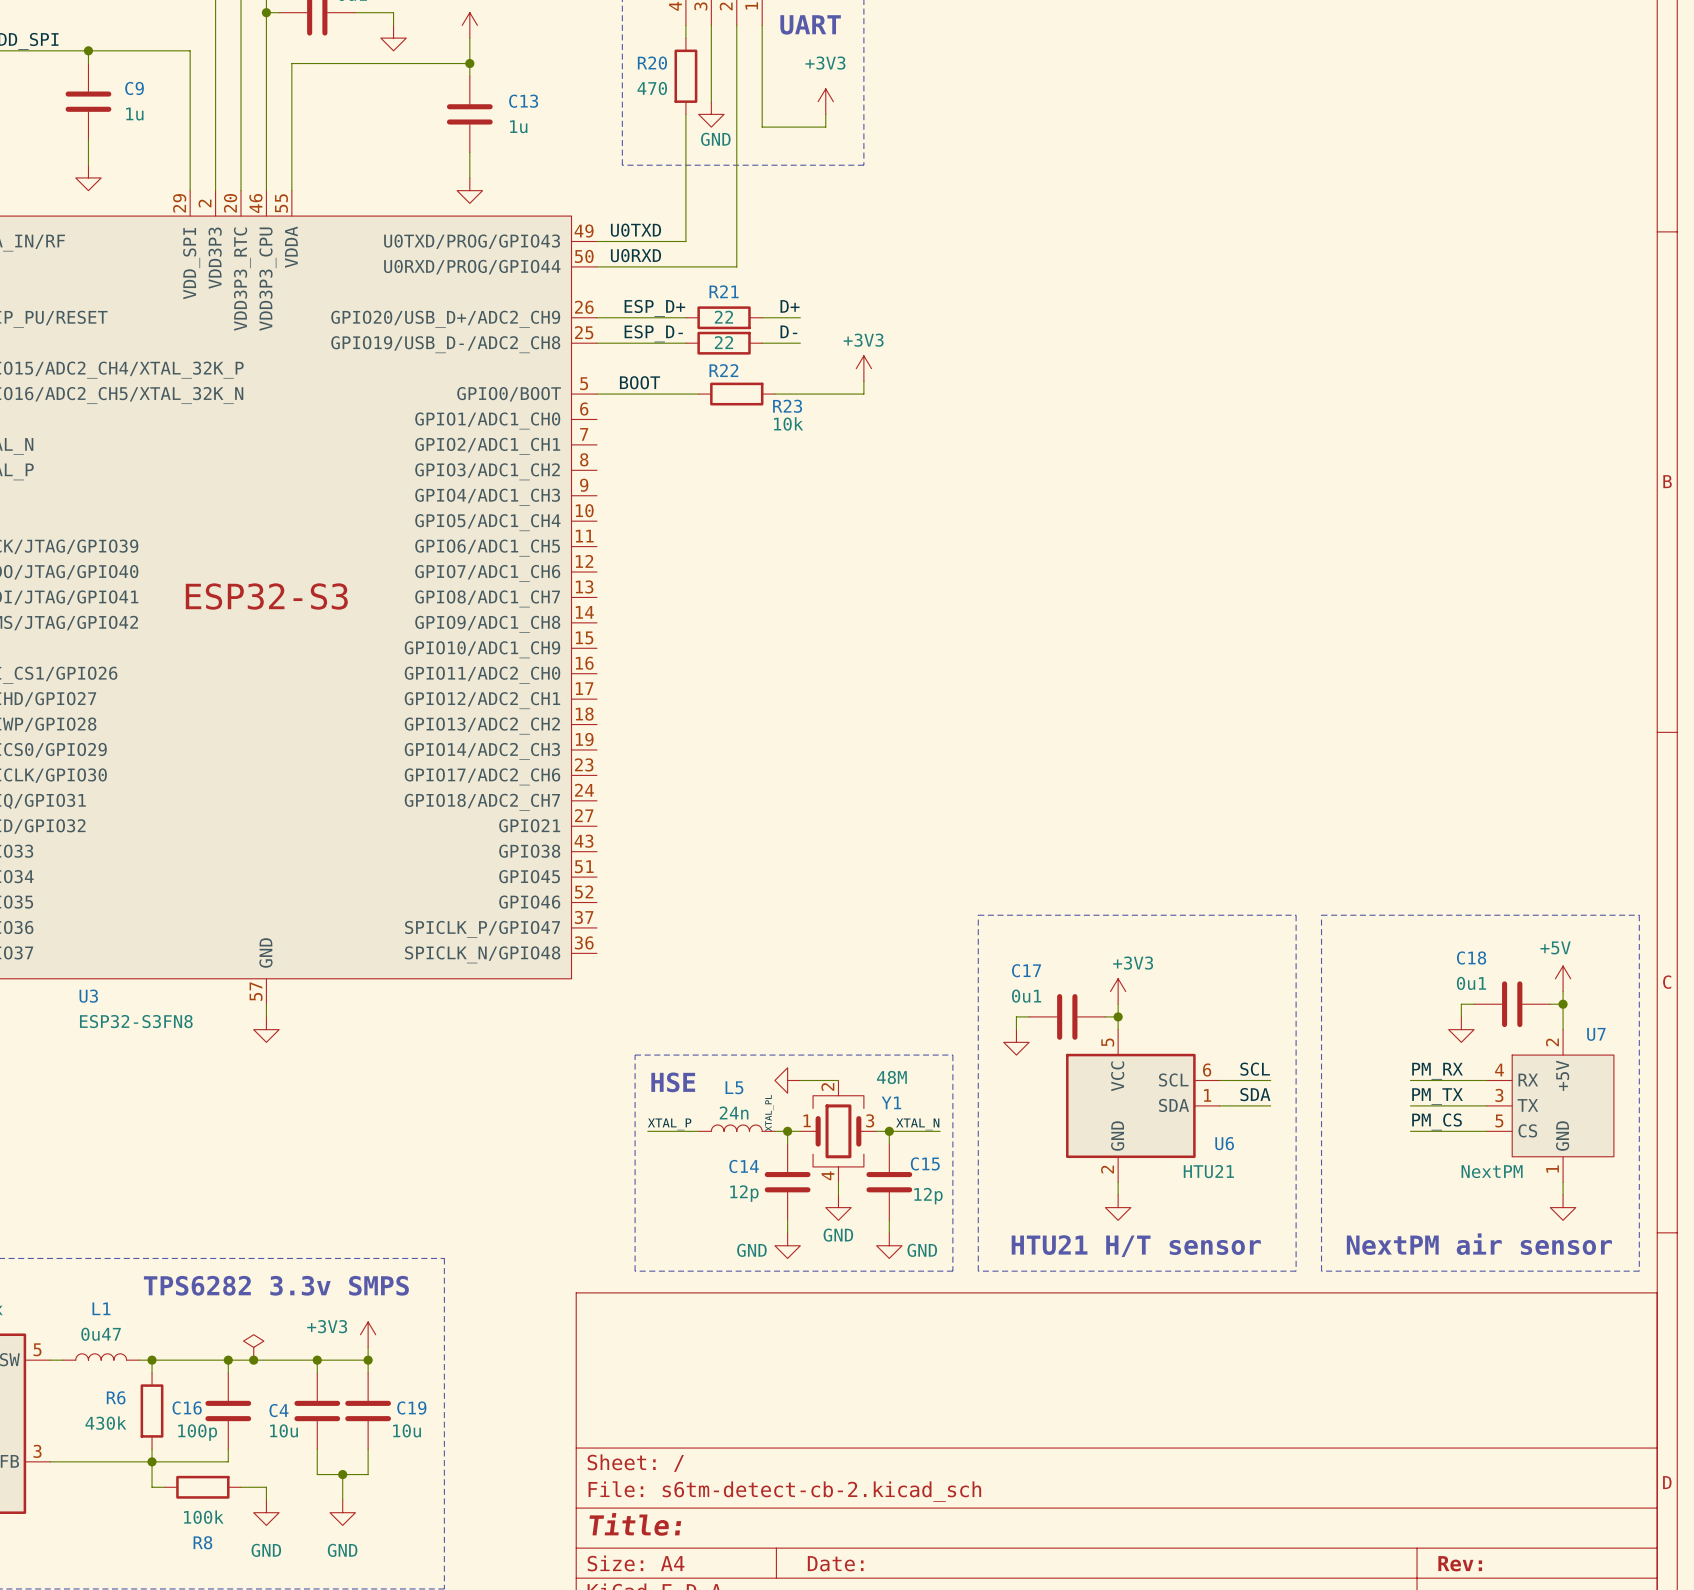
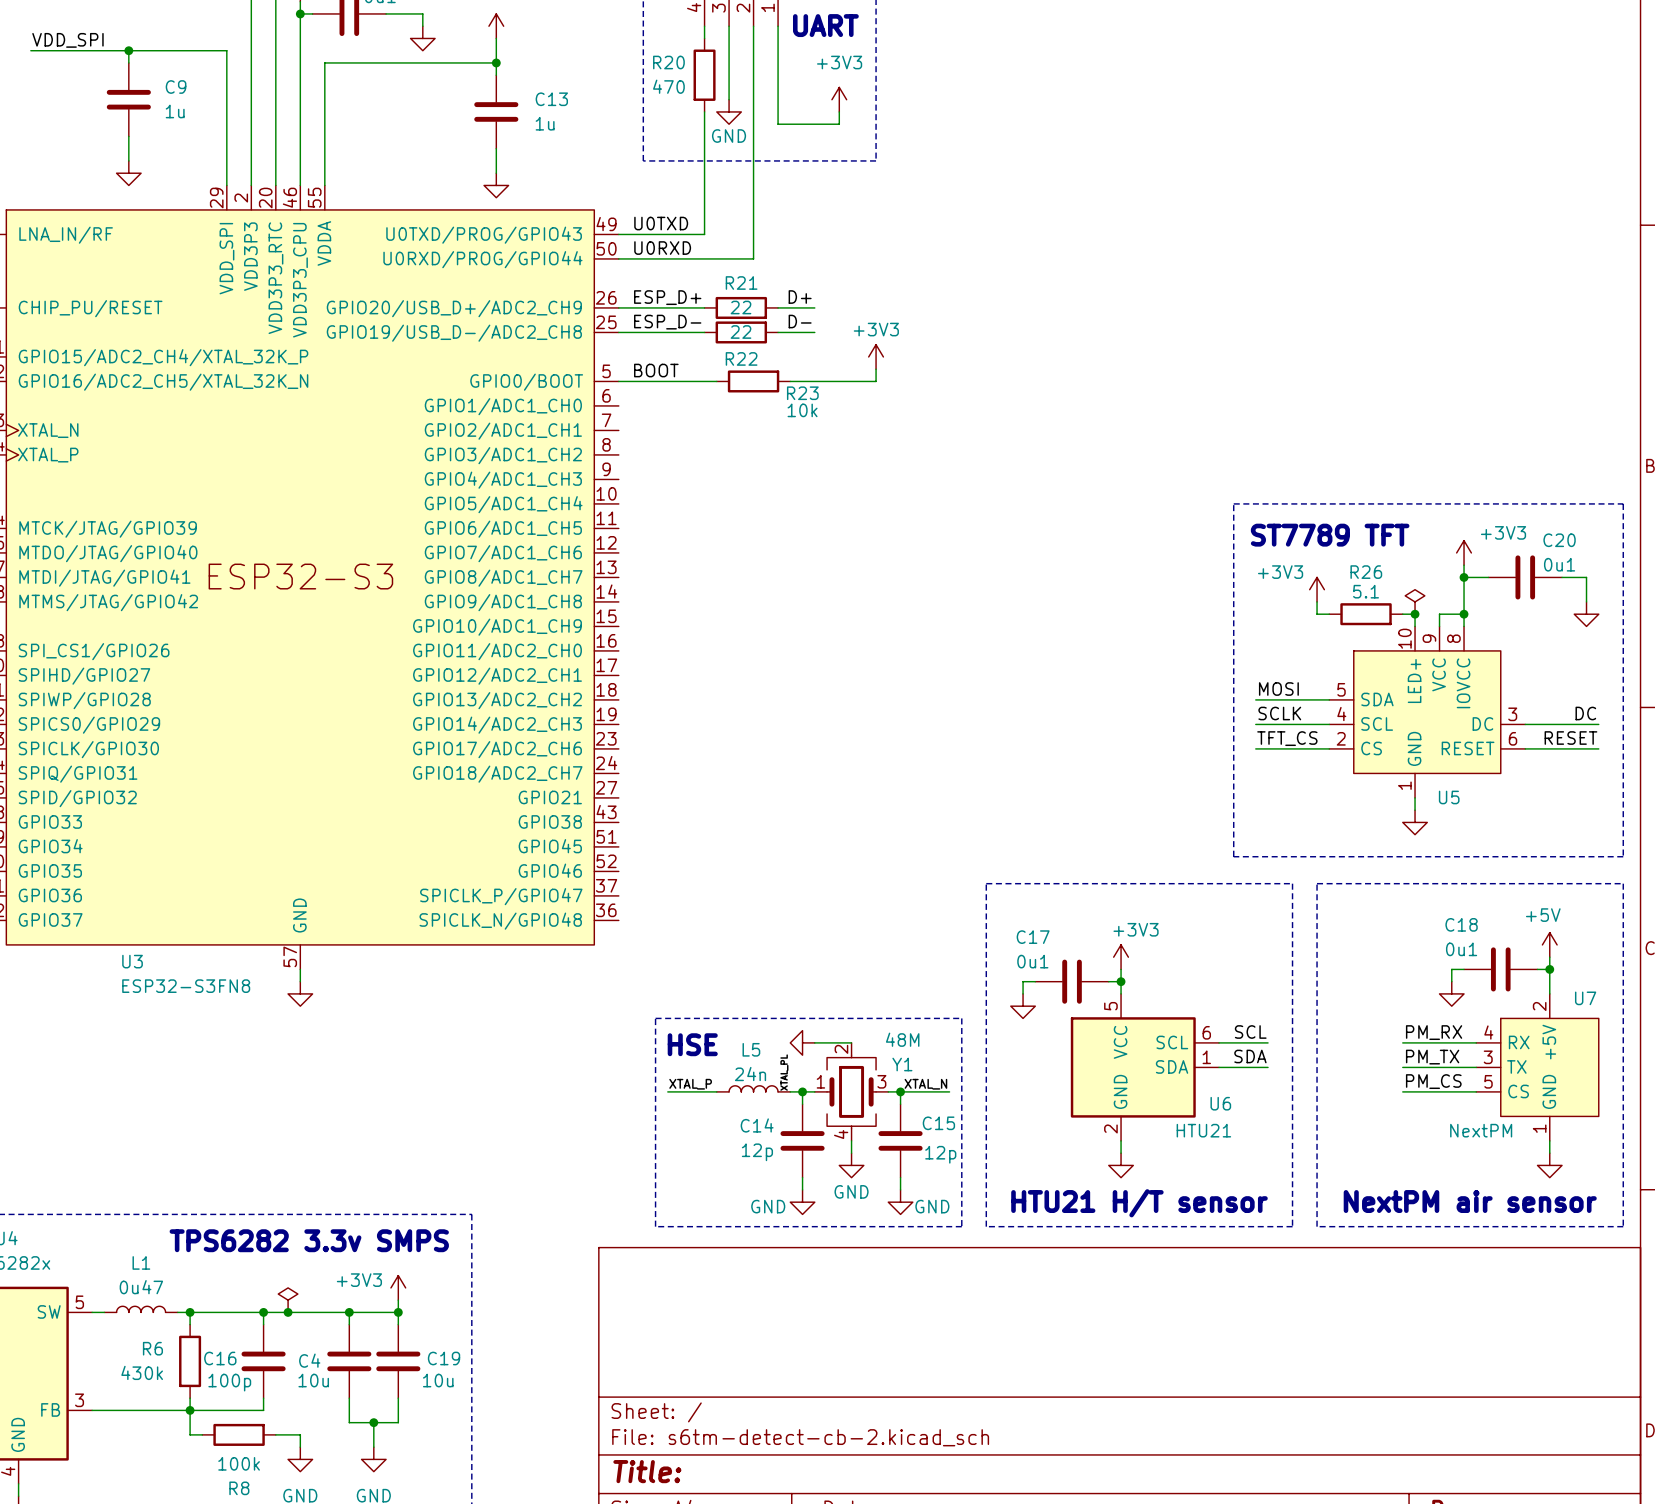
line: none -> (1233, 503) (1623, 503) (1623, 856) (1233, 856) (1233, 503)
text: none -> ST7789 TFT (1330, 535)
power symbol: none -> +3V3 (1464, 552)
wire: none -> (1464, 565) (1464, 626)
wire: none -> (1464, 577) (1488, 577)
junction: none -> (1464, 577)
C20: none -> 0u1 (1525, 577)
wire: none -> (1562, 577) (1586, 577) (1586, 601)
power symbol: none -> +3V3 (1317, 589)
wire: none -> (1317, 601) (1317, 614) (1329, 614)
power symbol: none -> (1415, 601)
R26: none -> 5.1 (1366, 614)
wire: none -> (1402, 614) (1415, 614) (1415, 626)
junction: none -> (1415, 614)
wire: none -> (1464, 614) (1439, 614) (1439, 626)
junction: none -> (1464, 614)
power symbol: none -> (1586, 614)
label: none -> MOSI (1278, 689)
wire: none -> (1255, 699) (1329, 699)
U5: none -> (1427, 712)
label: none -> SCLK (1279, 713)
label: none -> DC (1585, 713)
wire: none -> (1255, 724) (1329, 724)
wire: none -> (1525, 724) (1598, 724)
label: none -> RESET (1570, 738)
label: none -> TFT_CS (1287, 738)
wire: none -> (1255, 748) (1329, 748)
wire: none -> (1525, 748) (1598, 748)
wire: none -> (1415, 797) (1415, 810)
power symbol: none -> (1415, 822)

